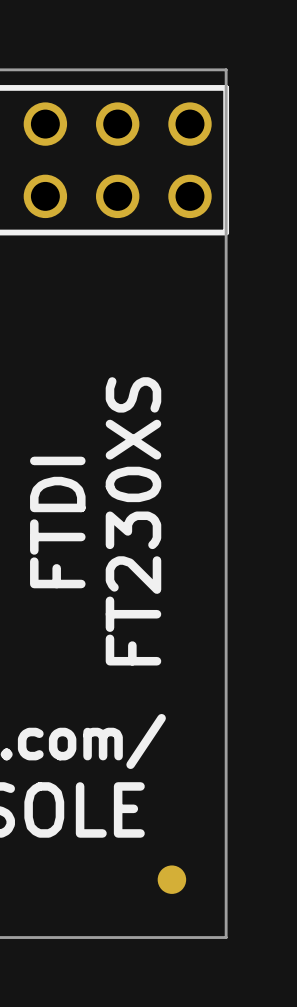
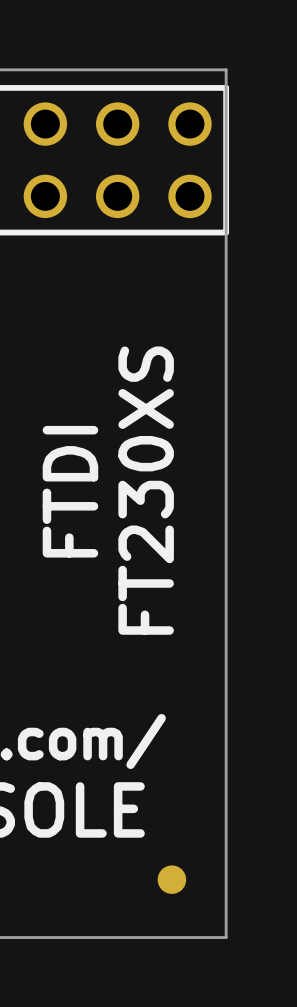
text position: FT230XS (133, 521) -> FT230XS (146, 490)
text position: FTDI (57, 522) -> FTDI (70, 491)

